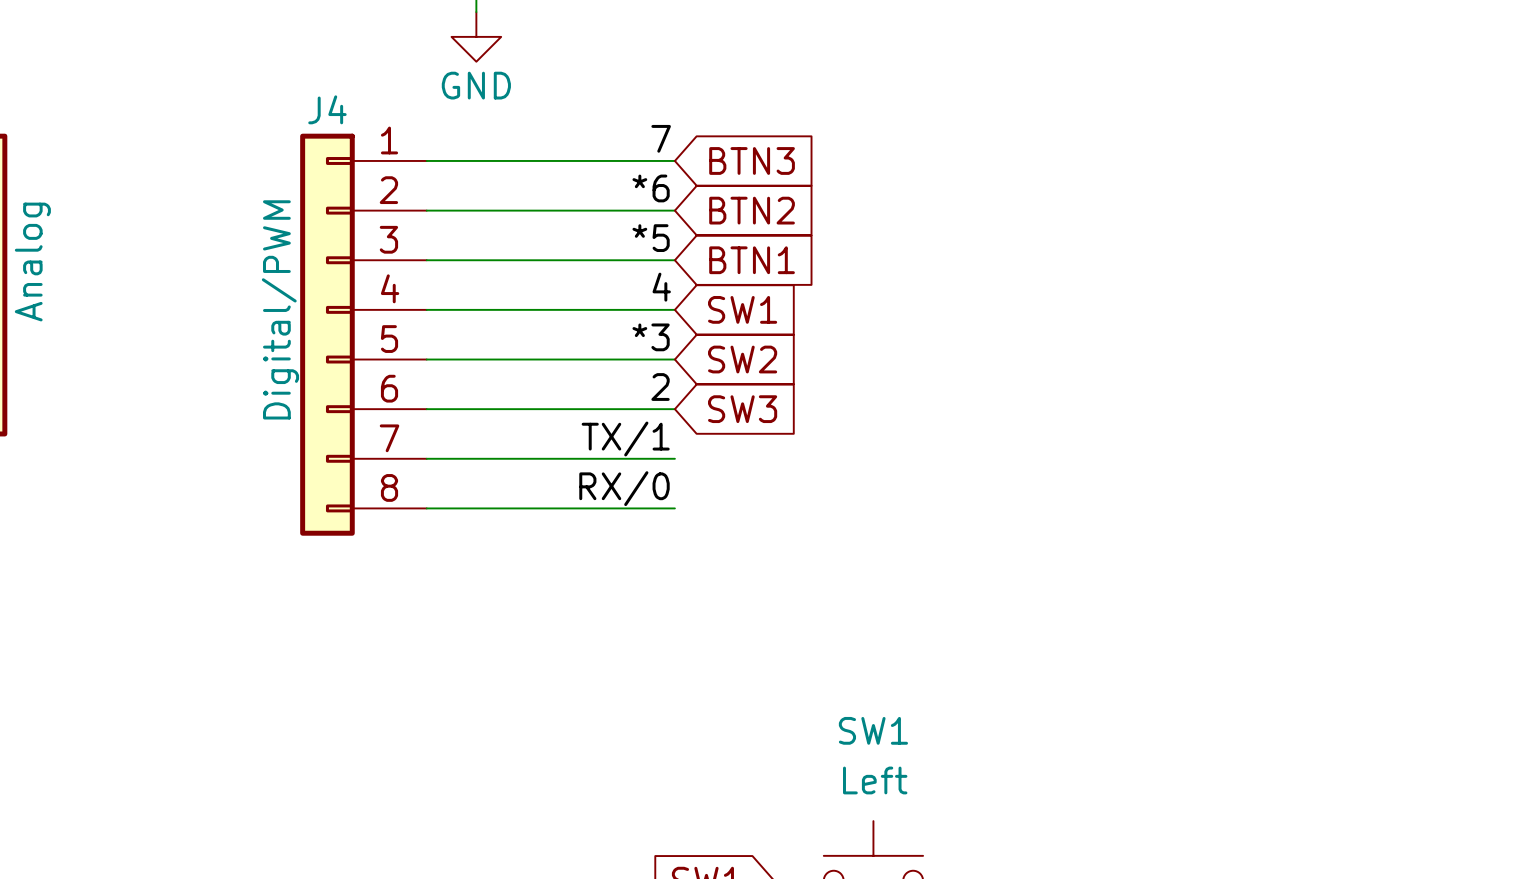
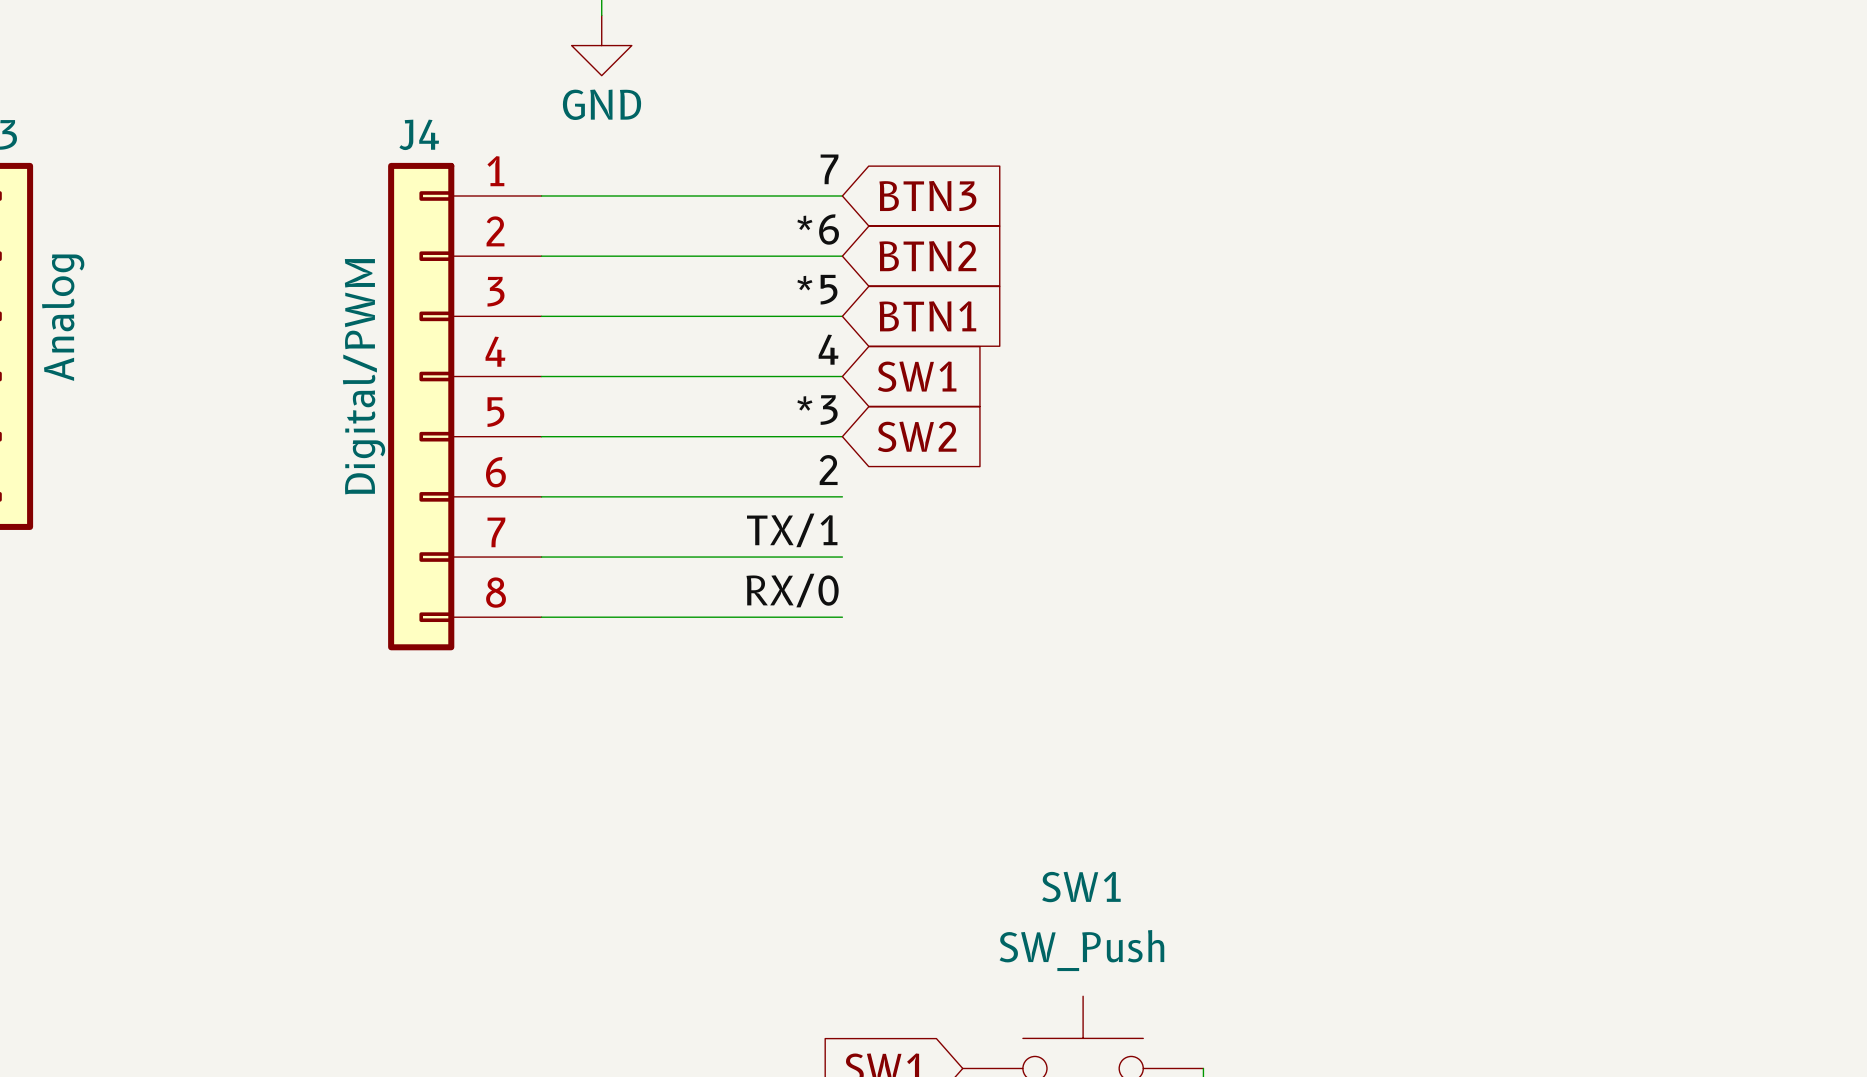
global label: SW3 (742, 409) -> none
SW1 value: Left (875, 780) -> SW_Push (1081, 950)

